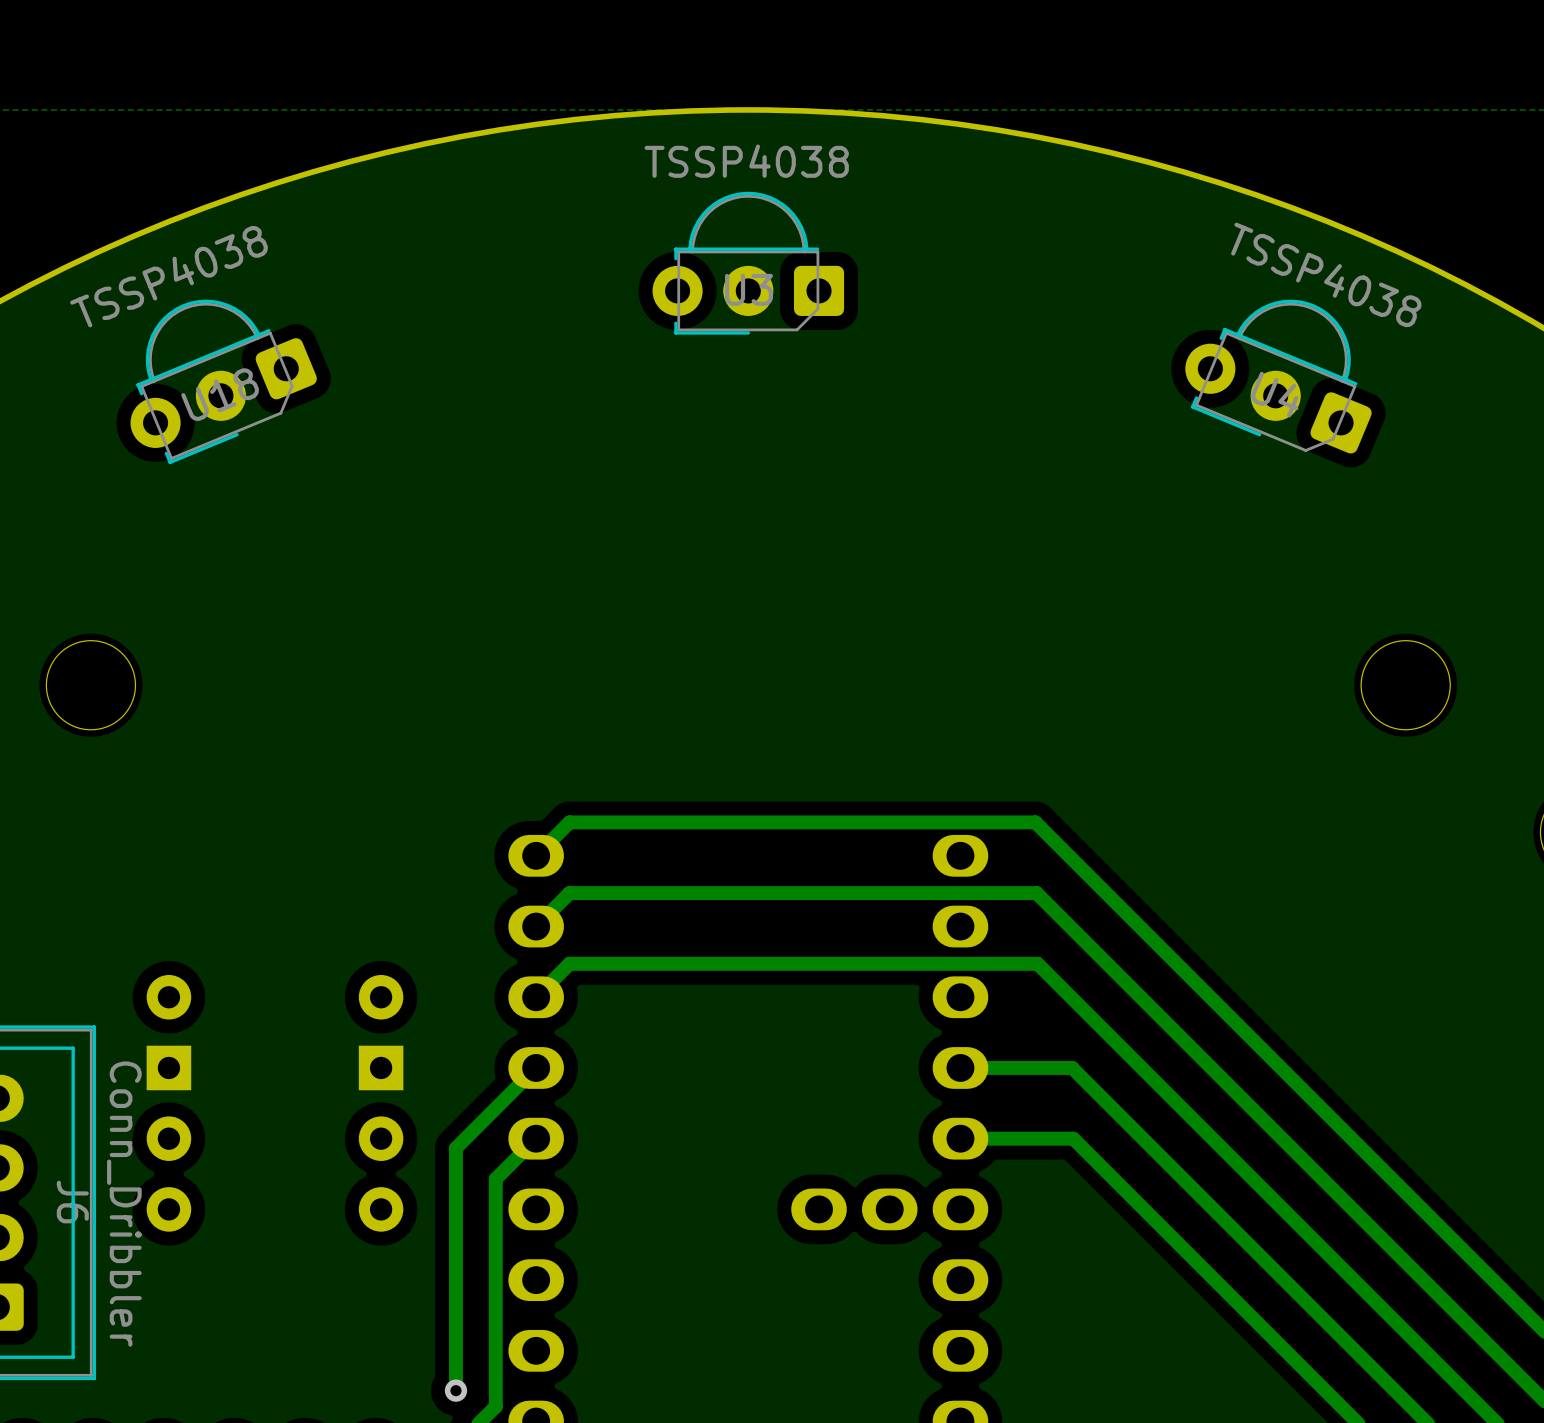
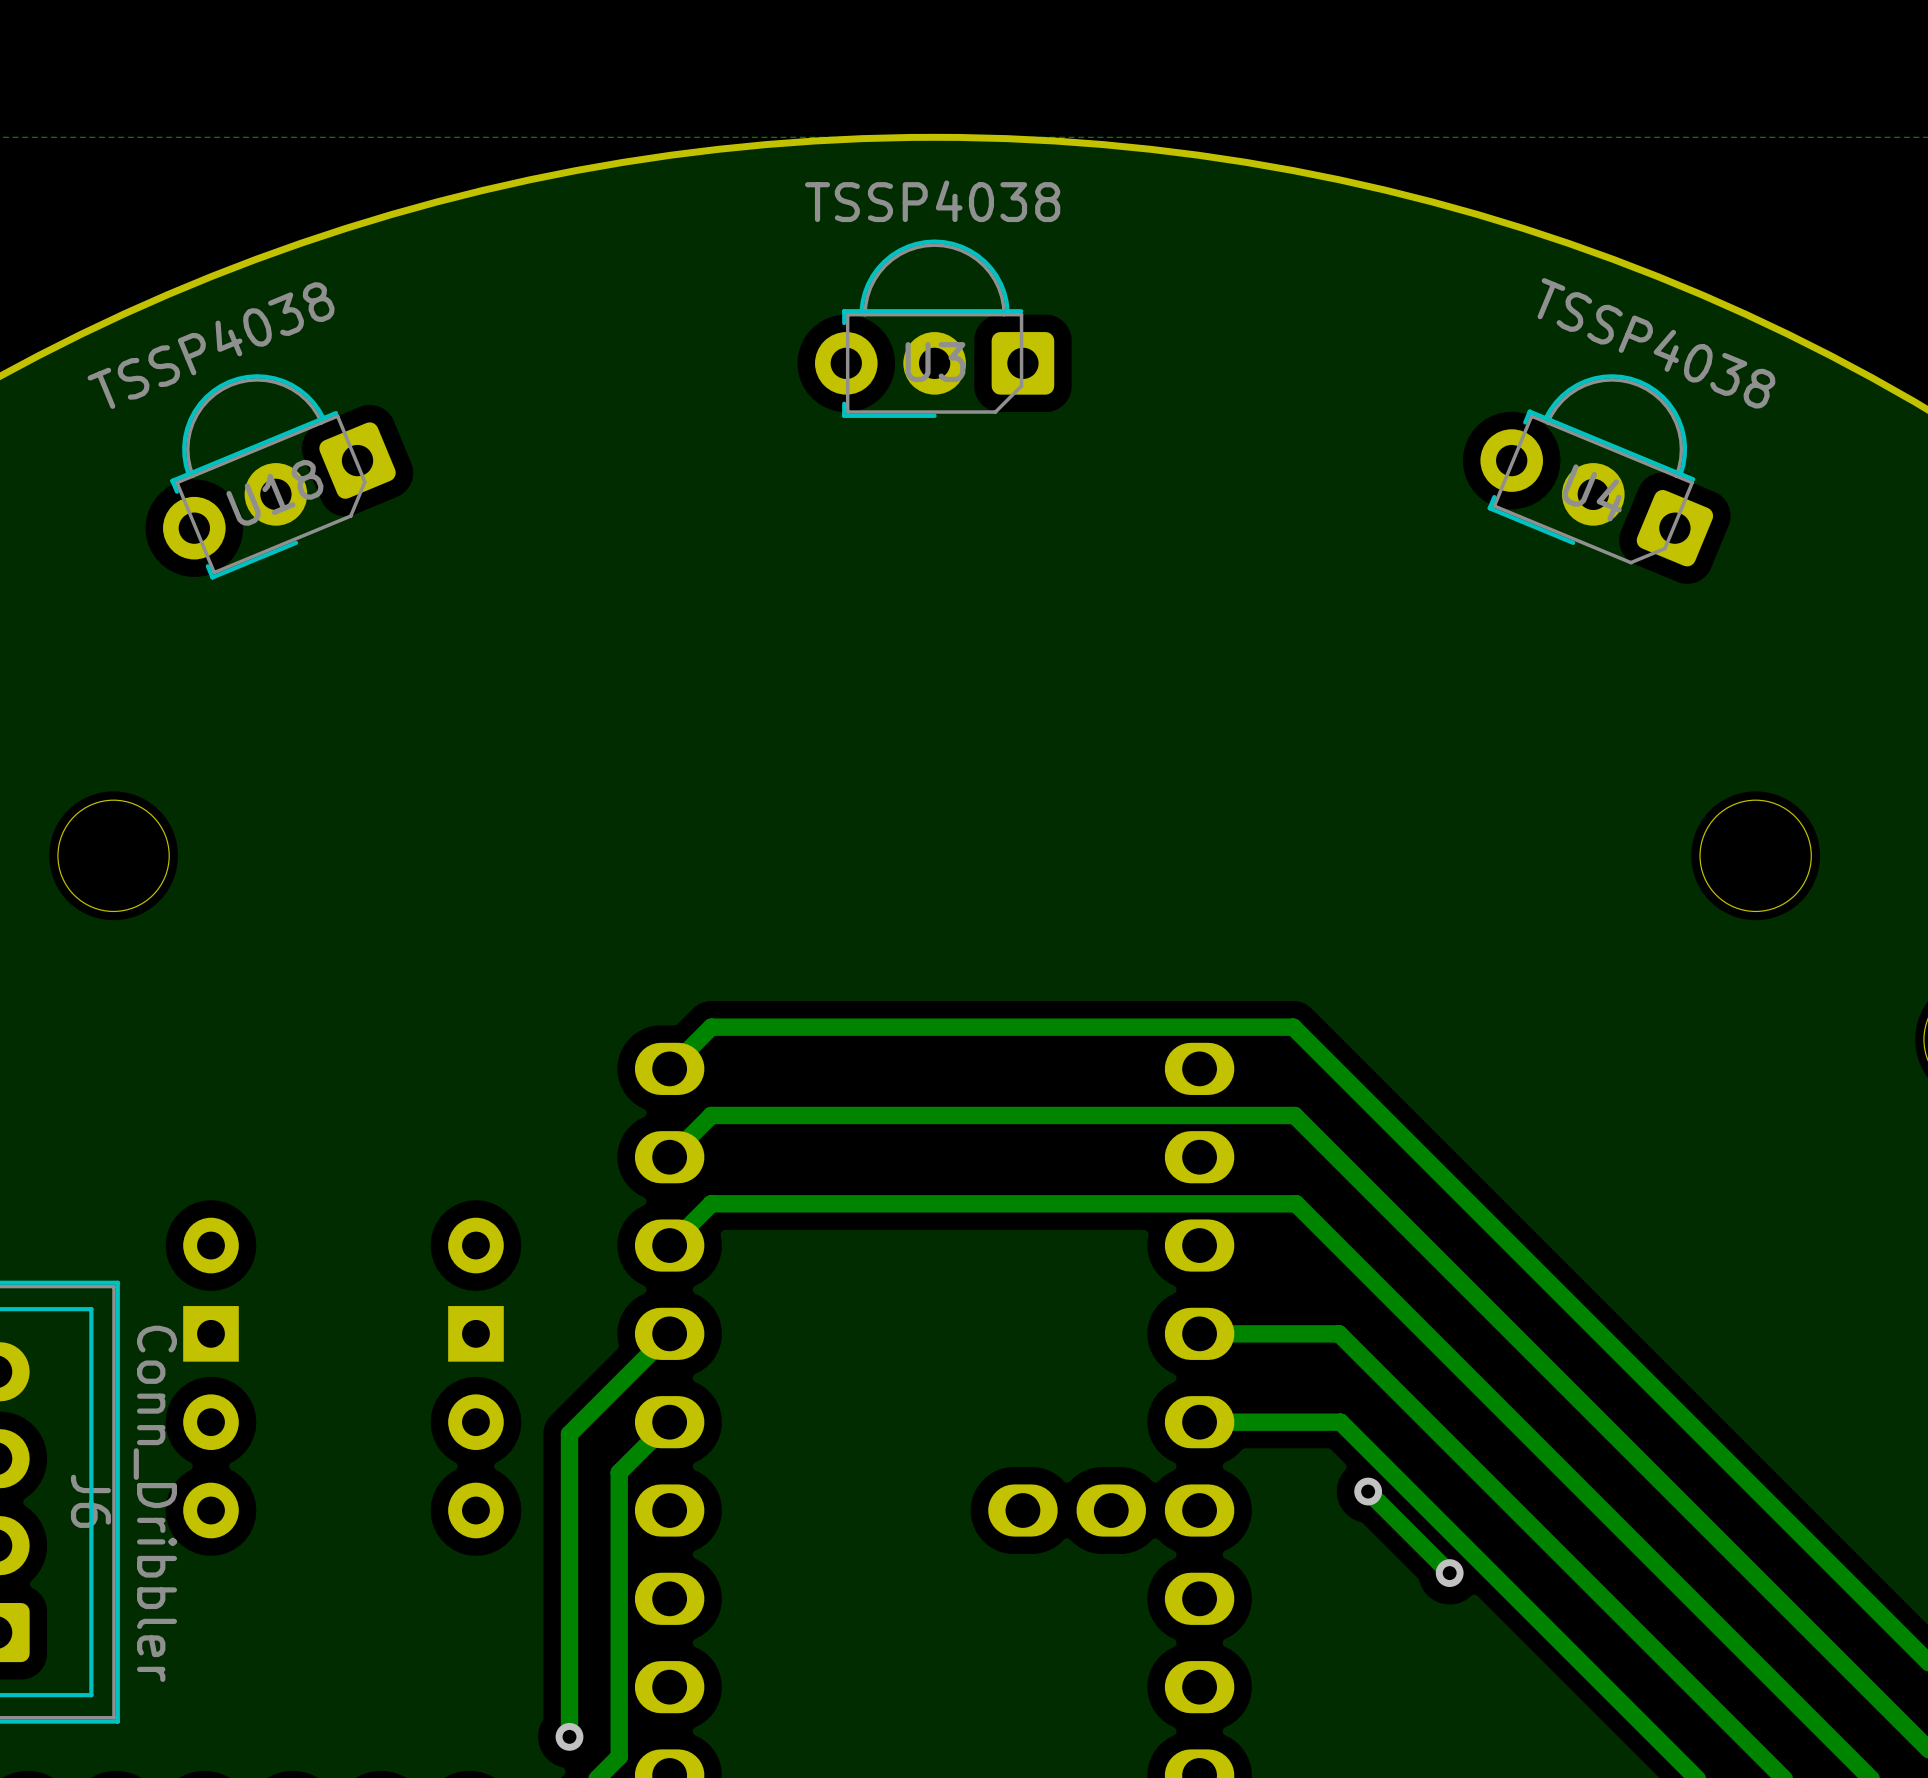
track: none -> (1368, 1491) (1449, 1573)
via: none -> (1368, 1491)
via: none -> (1449, 1573)

